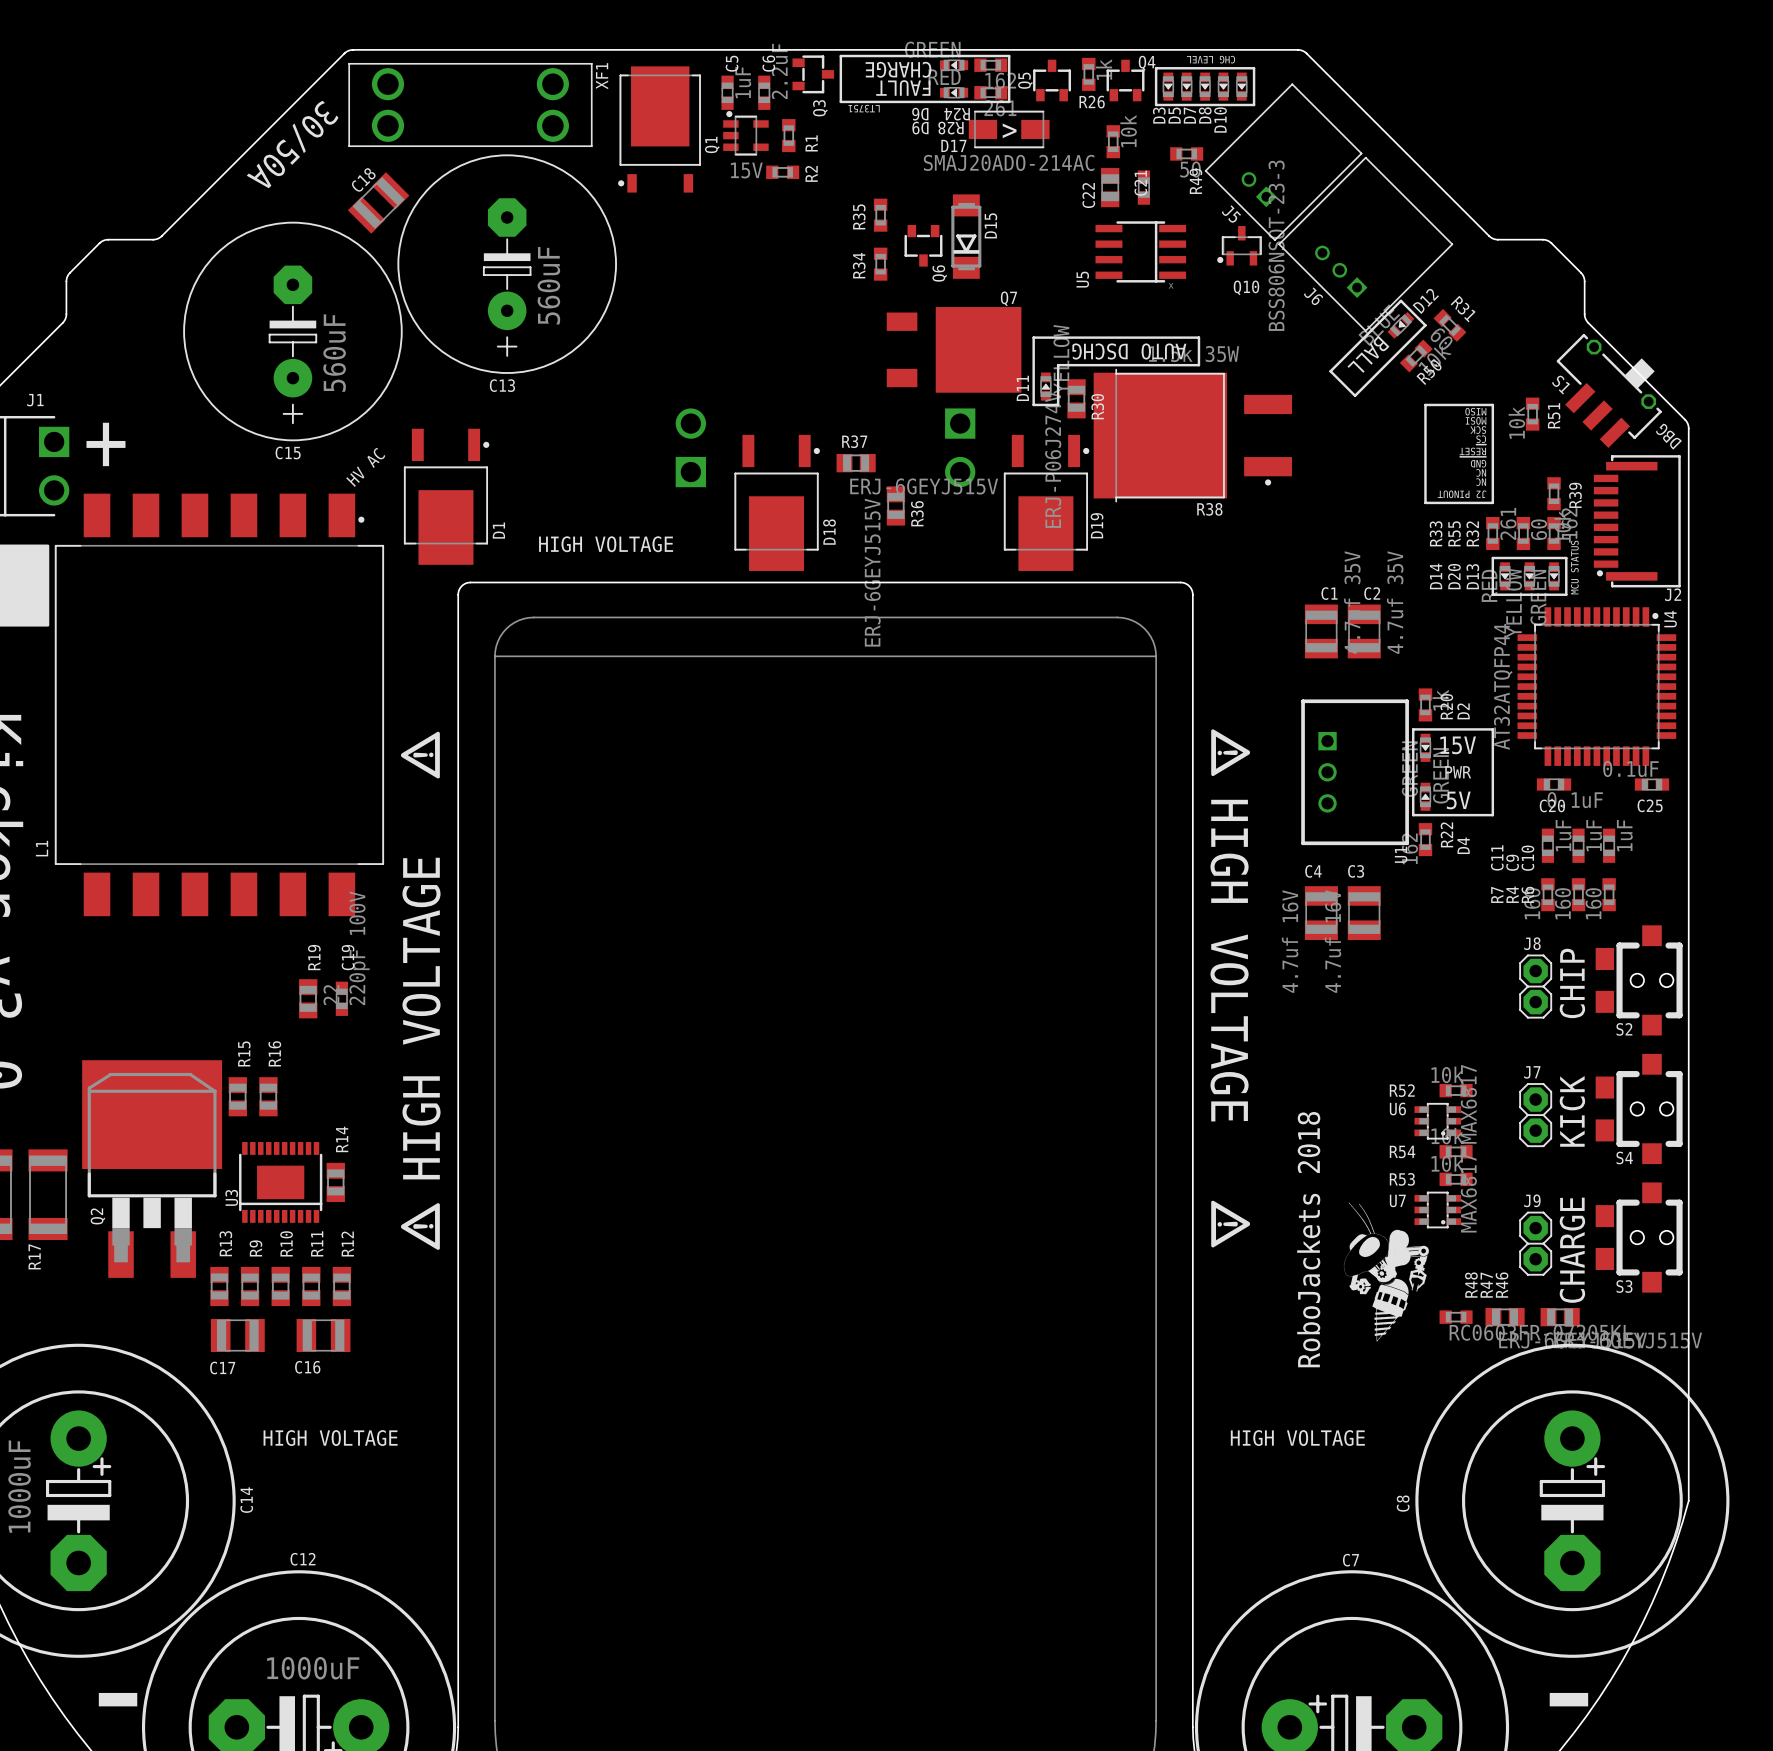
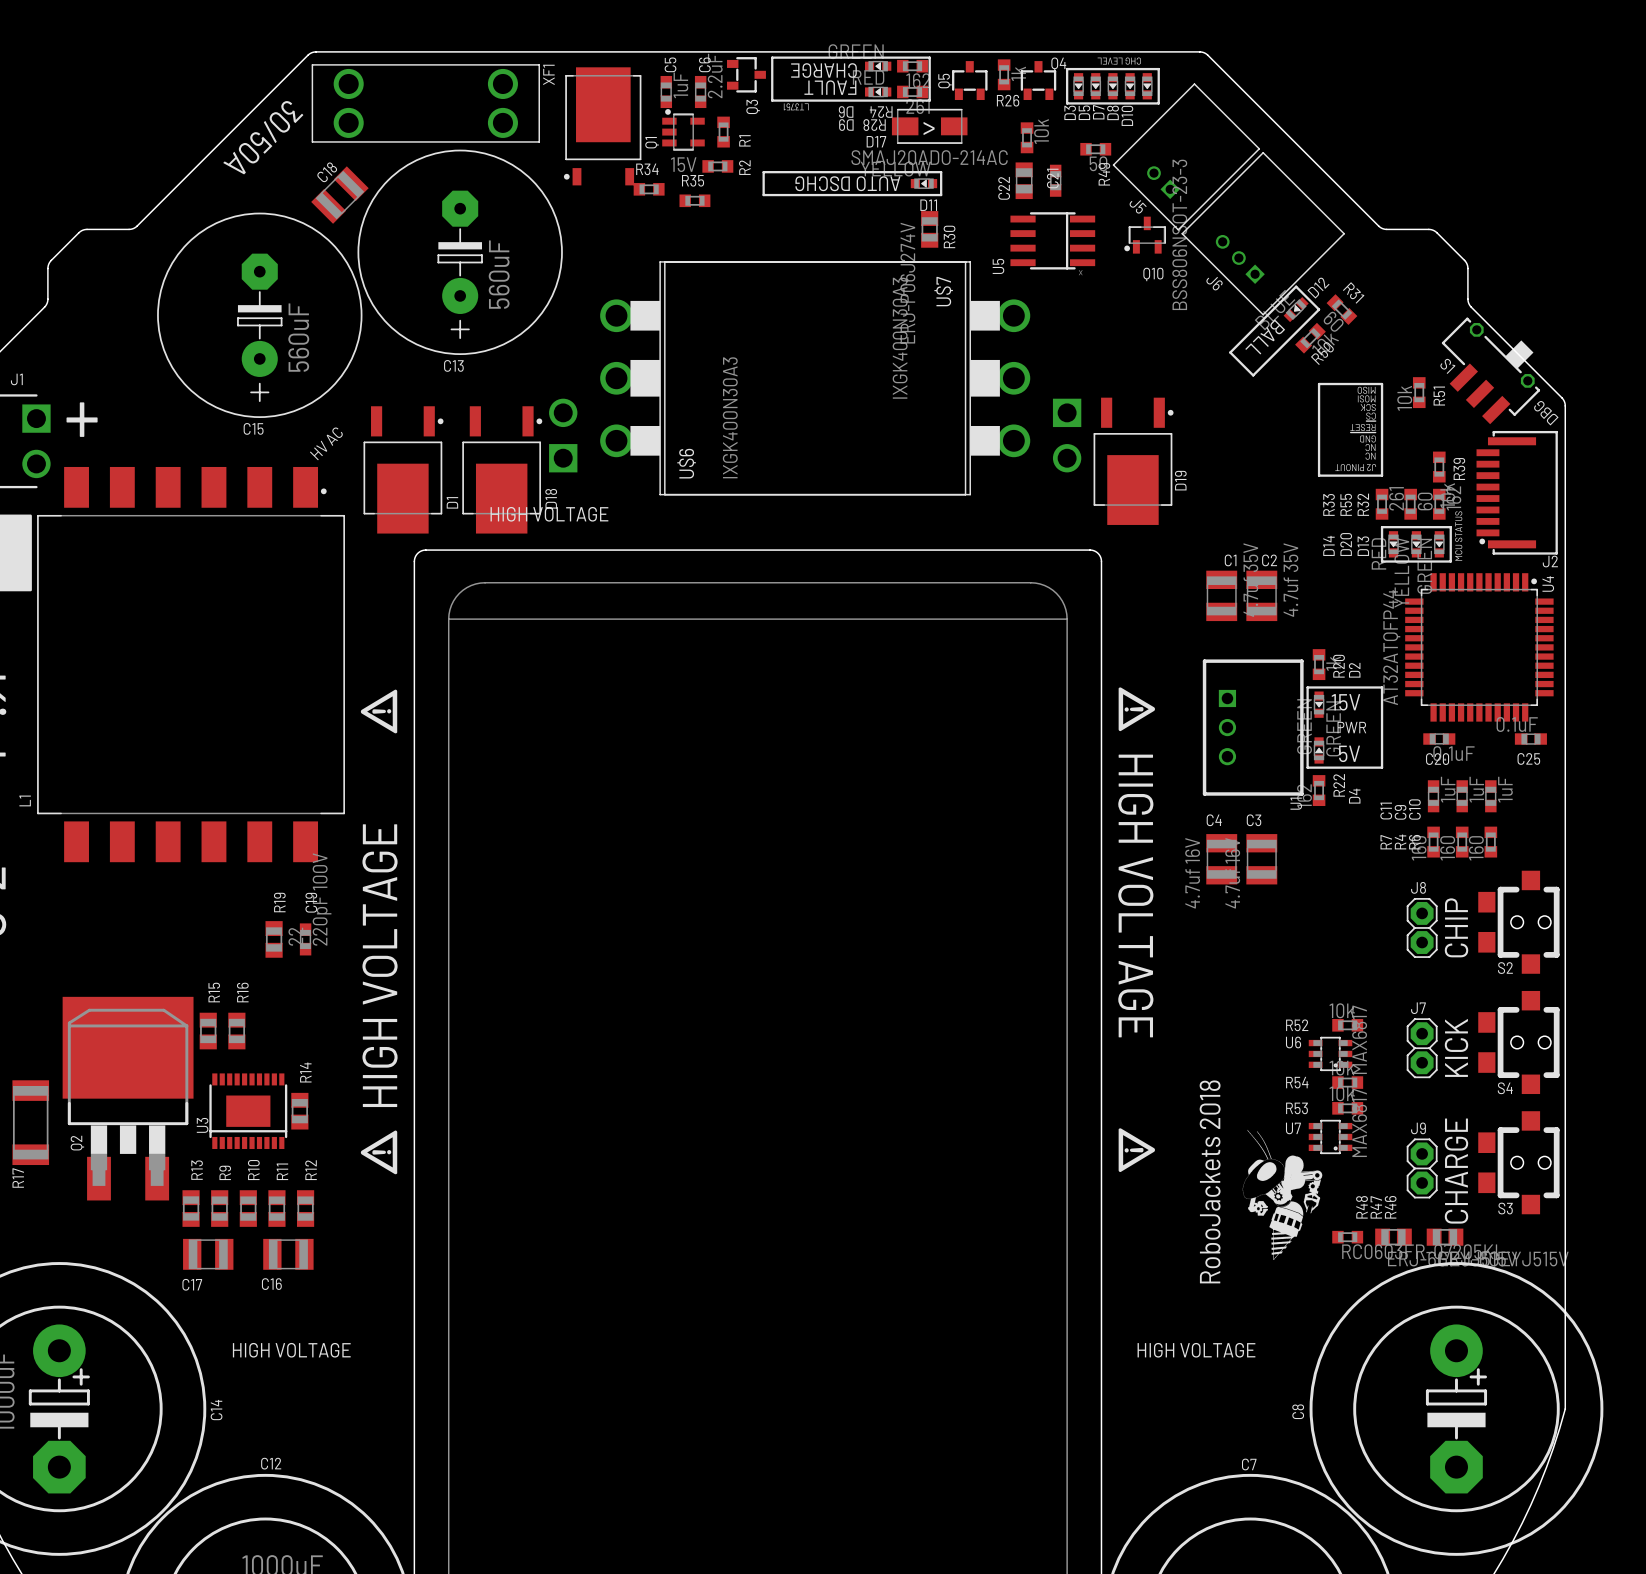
line: none -> (763, 172) (941, 172) (941, 195) (763, 195) (763, 172)
R35 rotation: 0° (880, 215) -> 90° clockwise (694, 200)
R35 position: (880, 215) -> (694, 200)
D15: (966, 236) -> none
Q6: (923, 245) -> none
R34 rotation: 0° (880, 264) -> 90° clockwise (649, 189)
R34 position: (880, 264) -> (649, 189)
line: (1033, 337) (1198, 337) (1198, 365) (1058, 365) (1058, 404) (1033, 404) (1033, 337) -> none
Q7: (954, 349) -> none
text position: AUTO DSCHG (1129, 351) -> AUTO DSCHG (847, 183)
D11 rotation: 0° (1045, 386) -> 90° counterclockwise (923, 183)
D11 position: (1045, 386) -> (923, 183)
U$7: none -> IXGK400N30A3 (783, 378)
U$6: none -> IXGK400N30A3 (847, 378)
R30 position: (1076, 398) -> (929, 229)
R38: 1.5k 35W (1192, 435) -> none
part position: (690, 447) -> (563, 435)
part: (960, 447) -> none
part: none -> (1067, 435)
R37: ERJ-6GEYJ515V (856, 463) -> none
D18 position: (777, 502) -> (502, 469)
D19 position: (1046, 502) -> (1133, 461)
R36: ERJ-6GEYJ515V (895, 505) -> none

